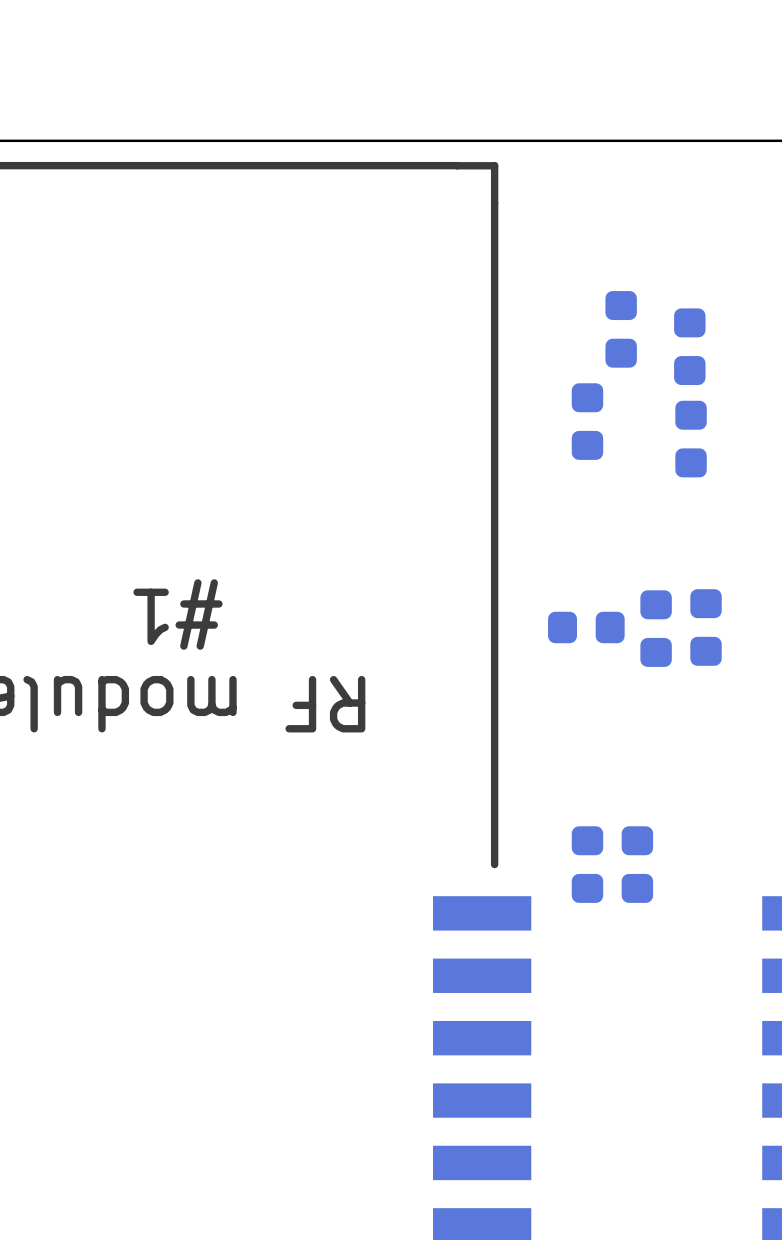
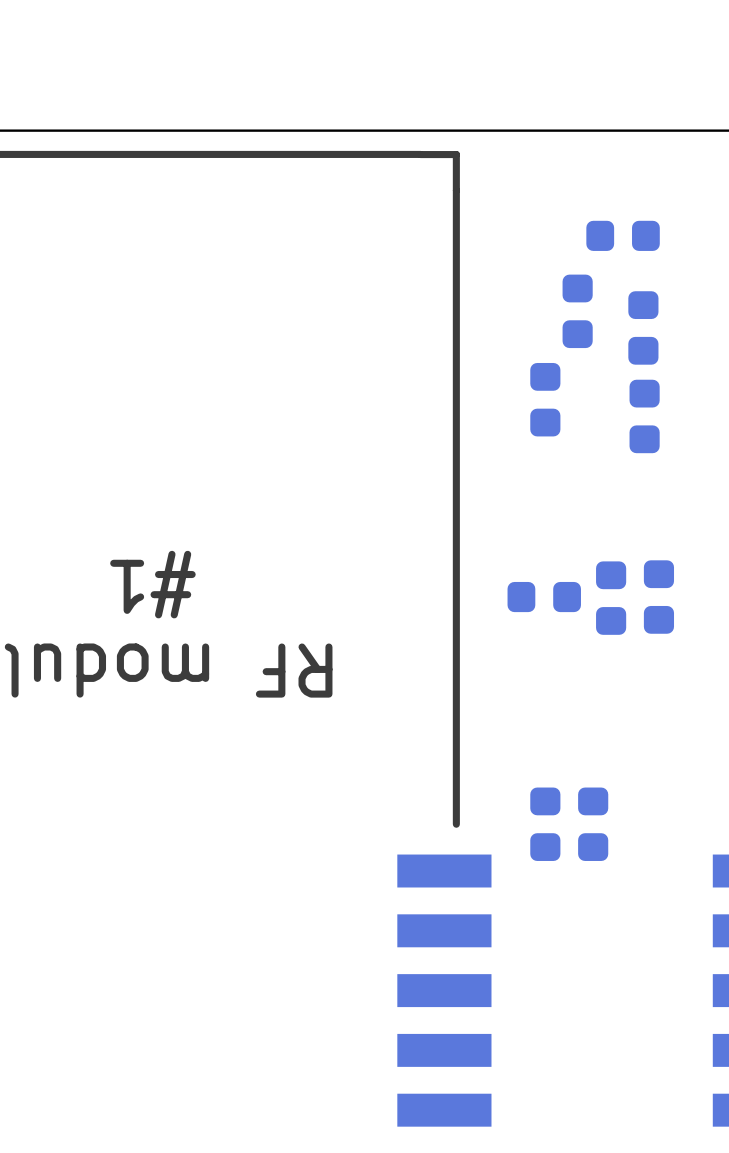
part: none -> (623, 235)

